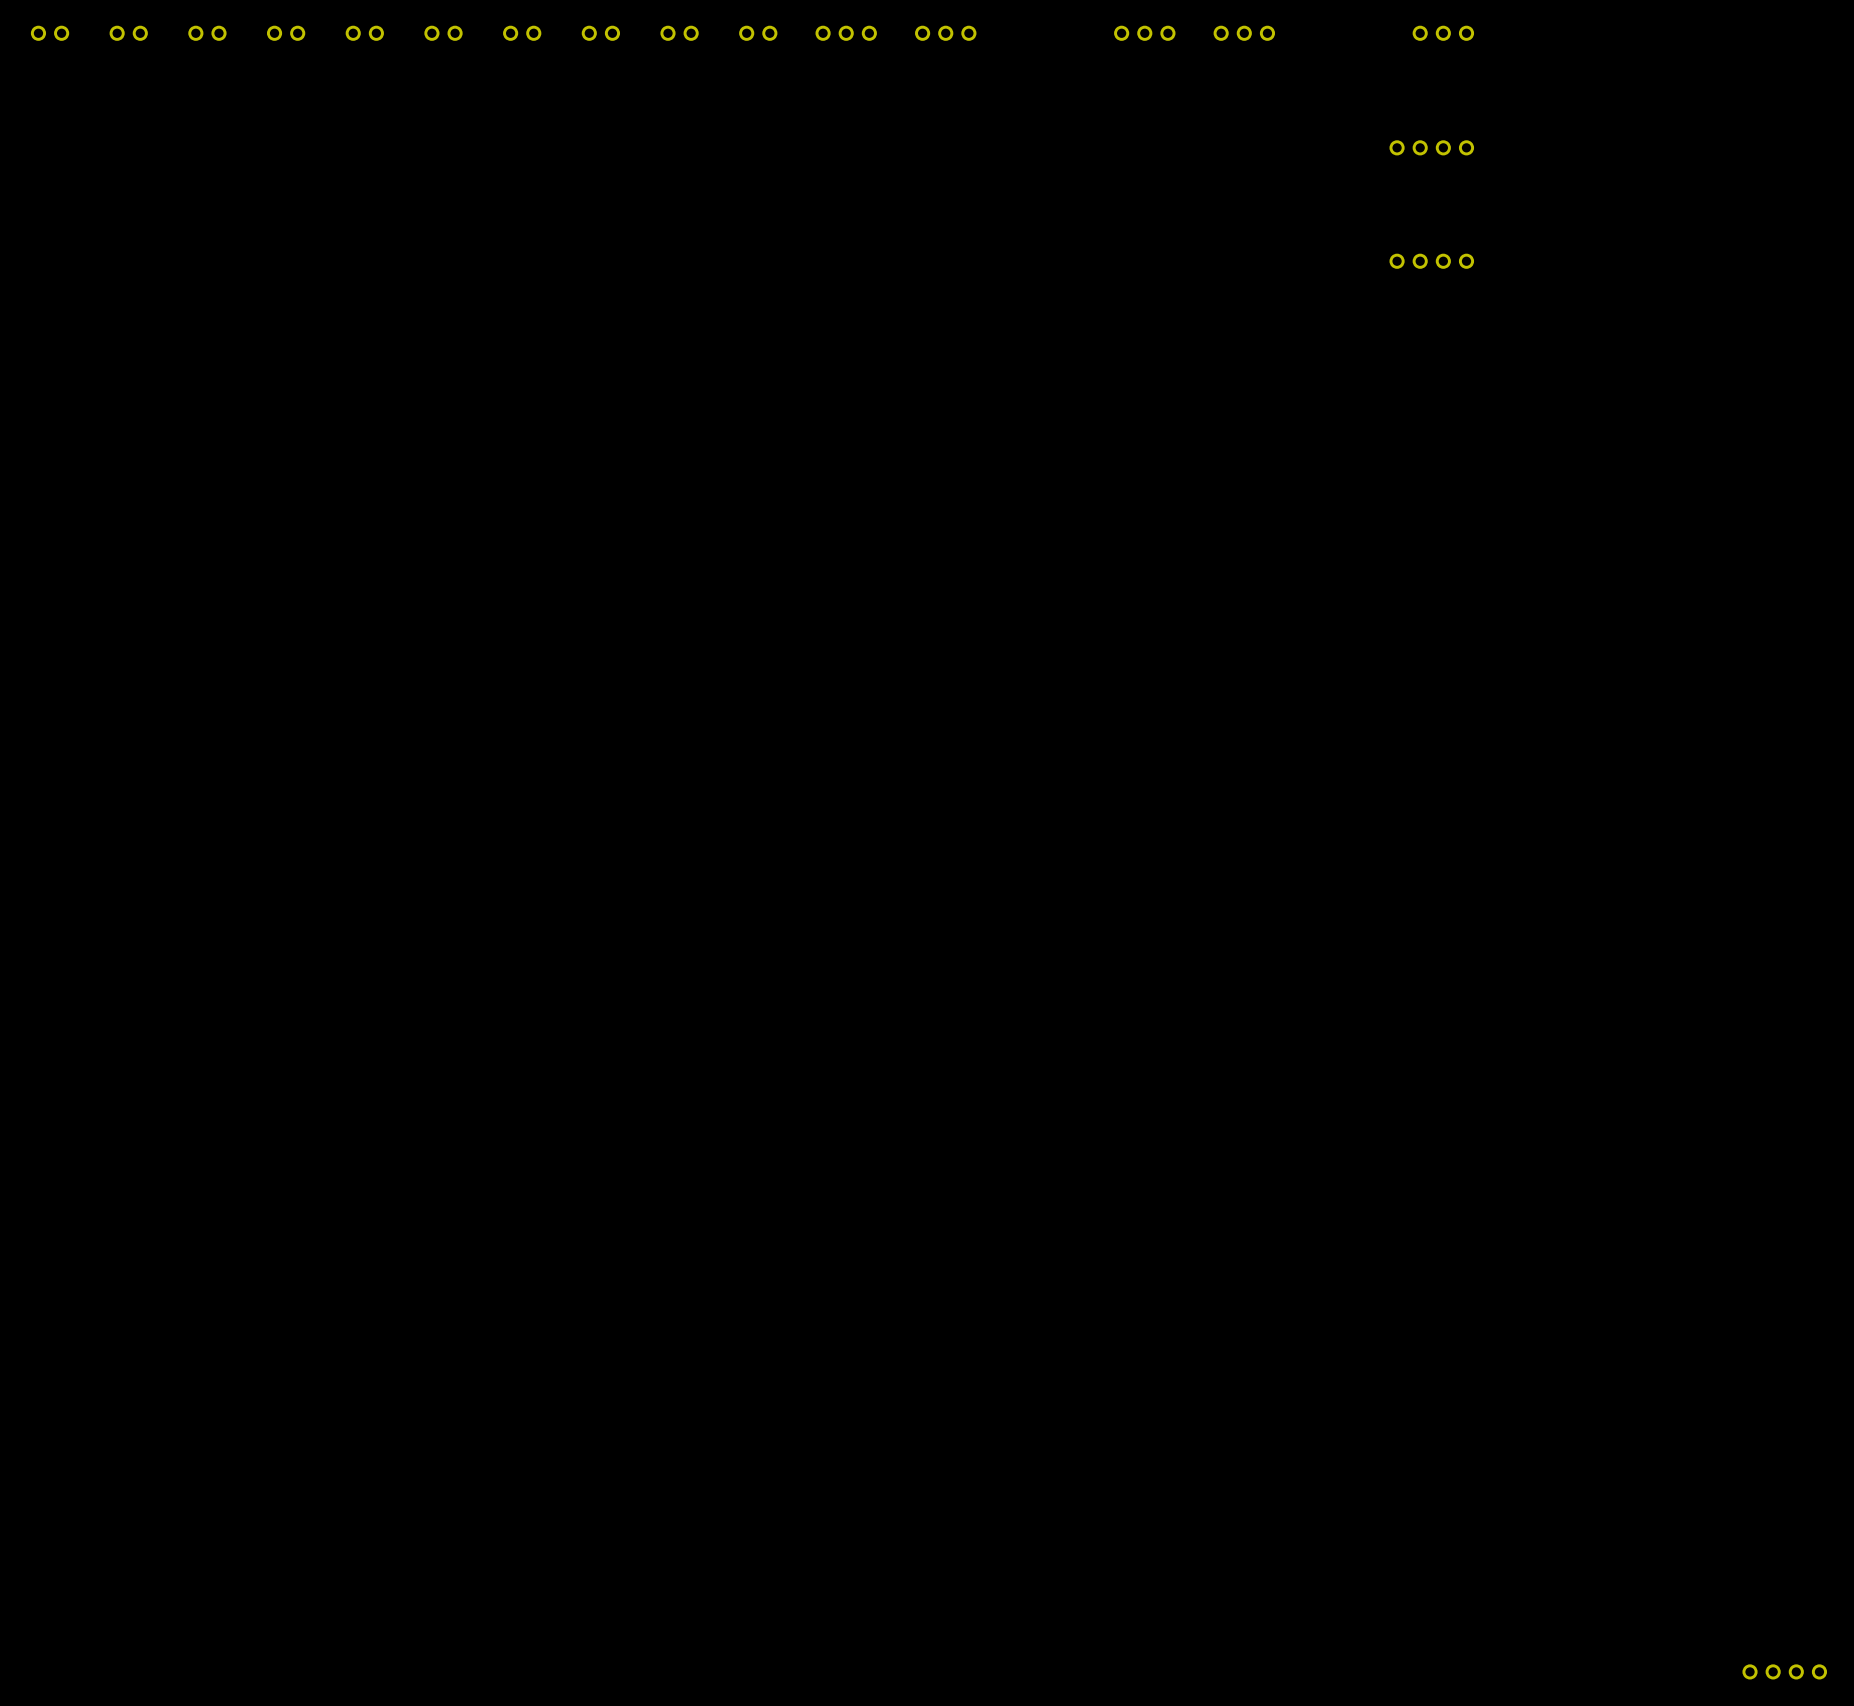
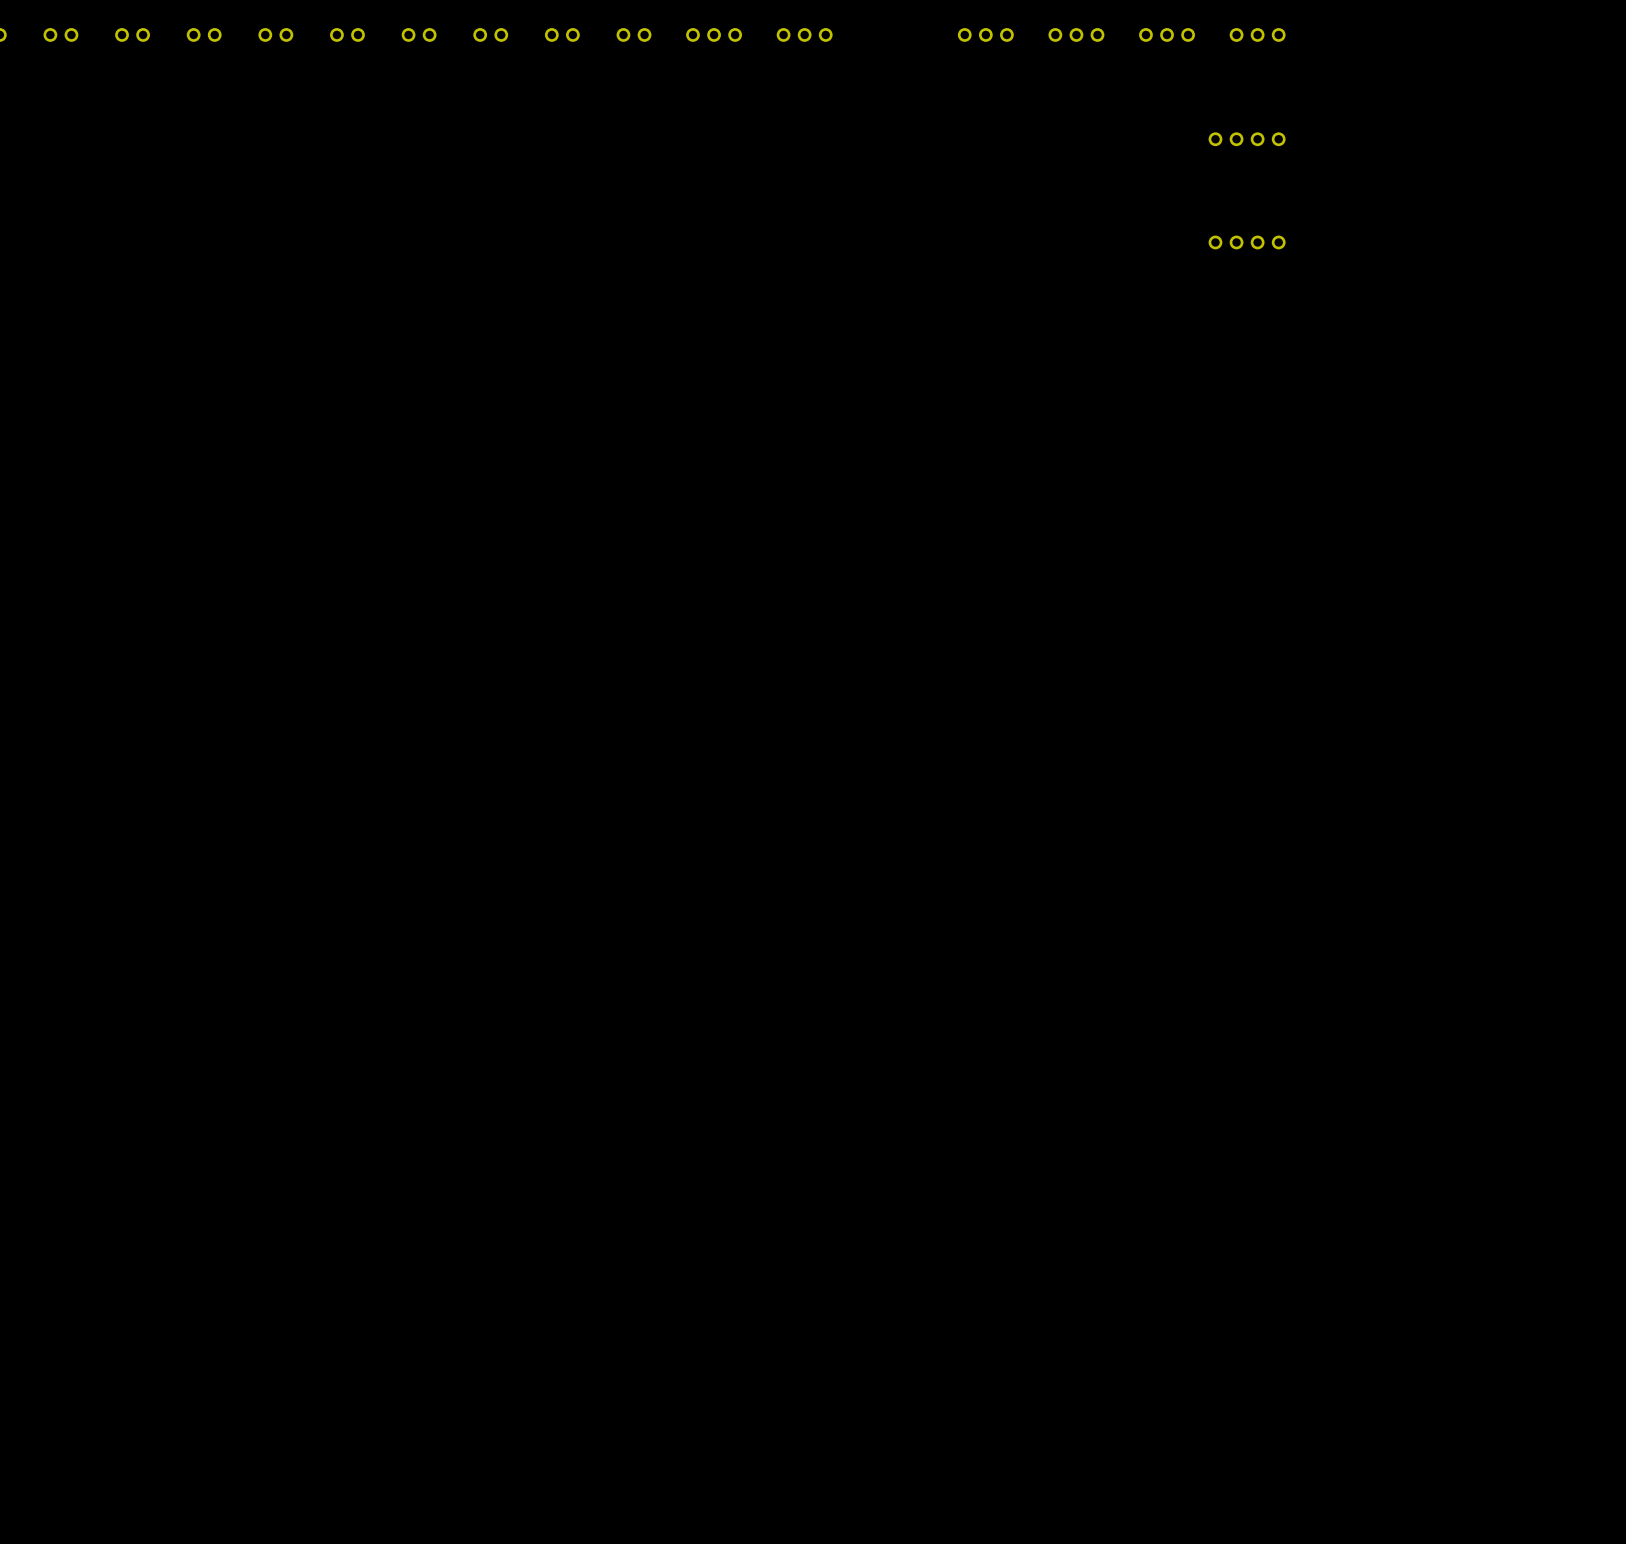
part: none -> (1167, 34)
part: (1784, 1671) -> none

